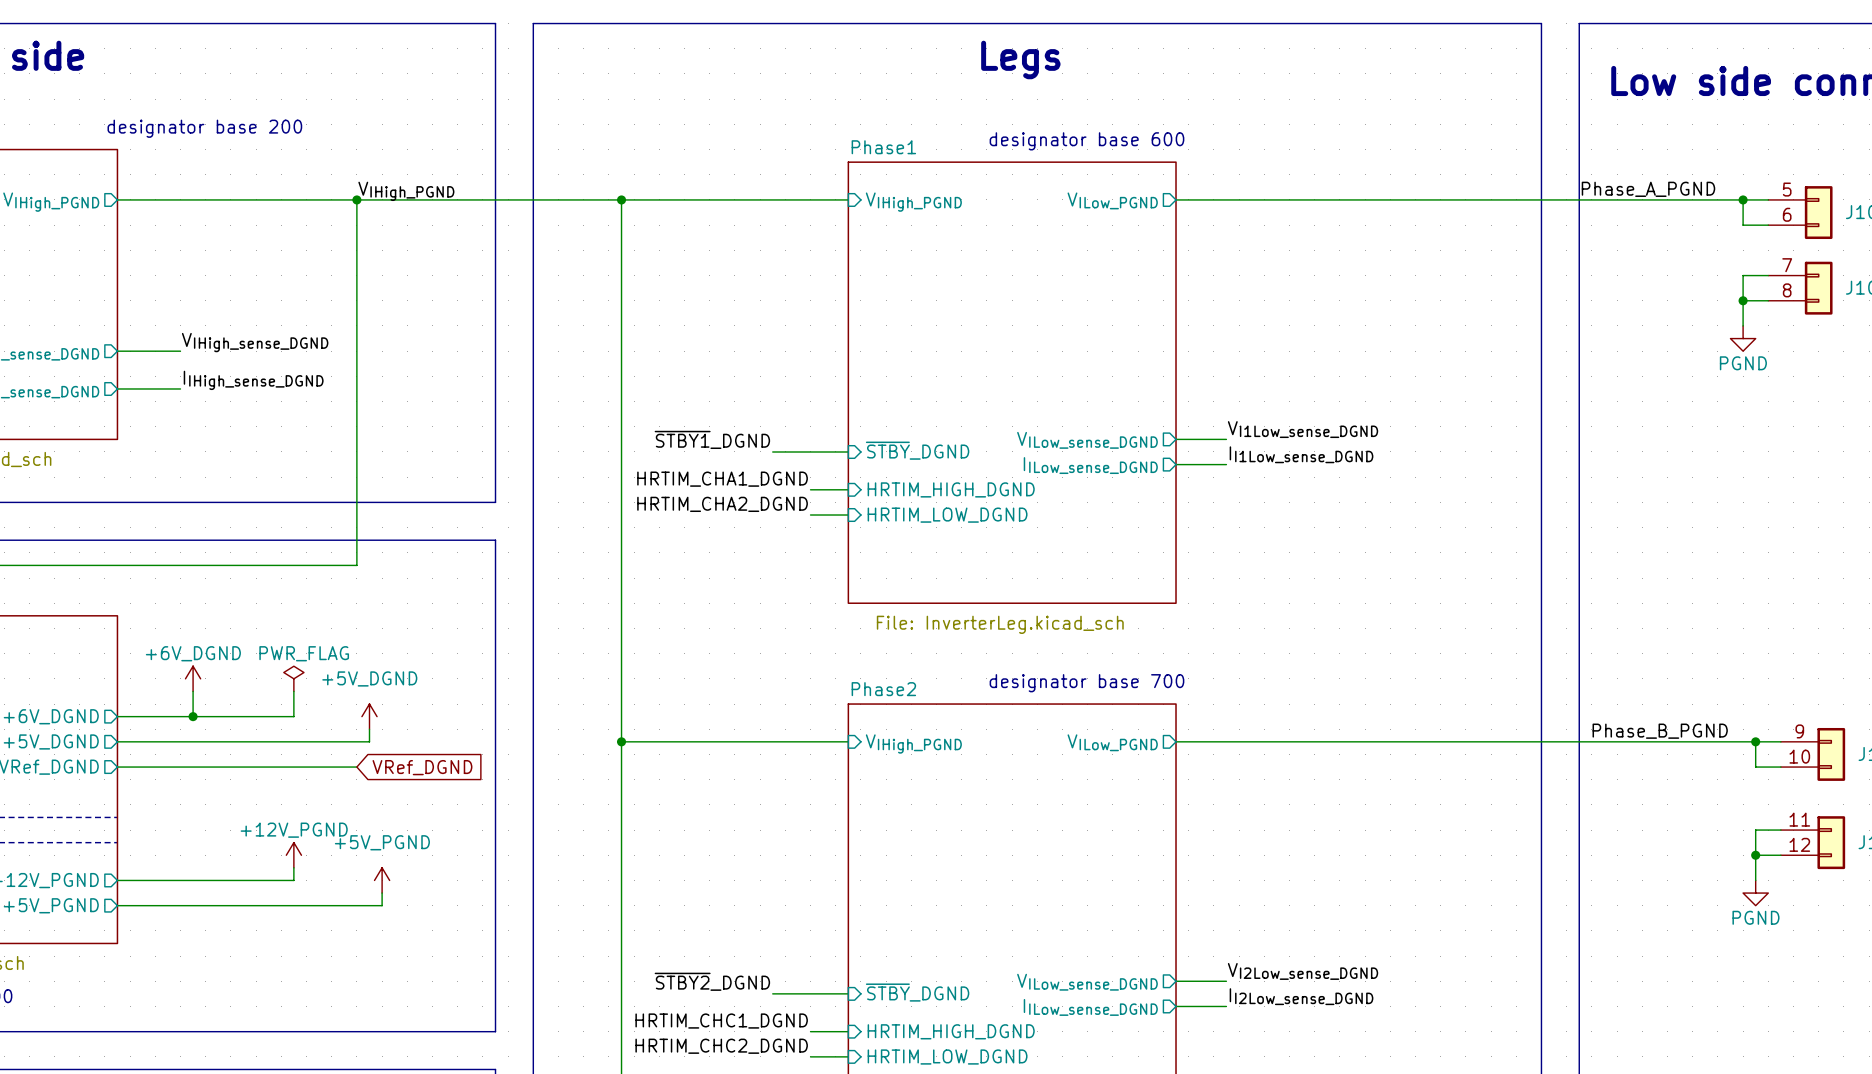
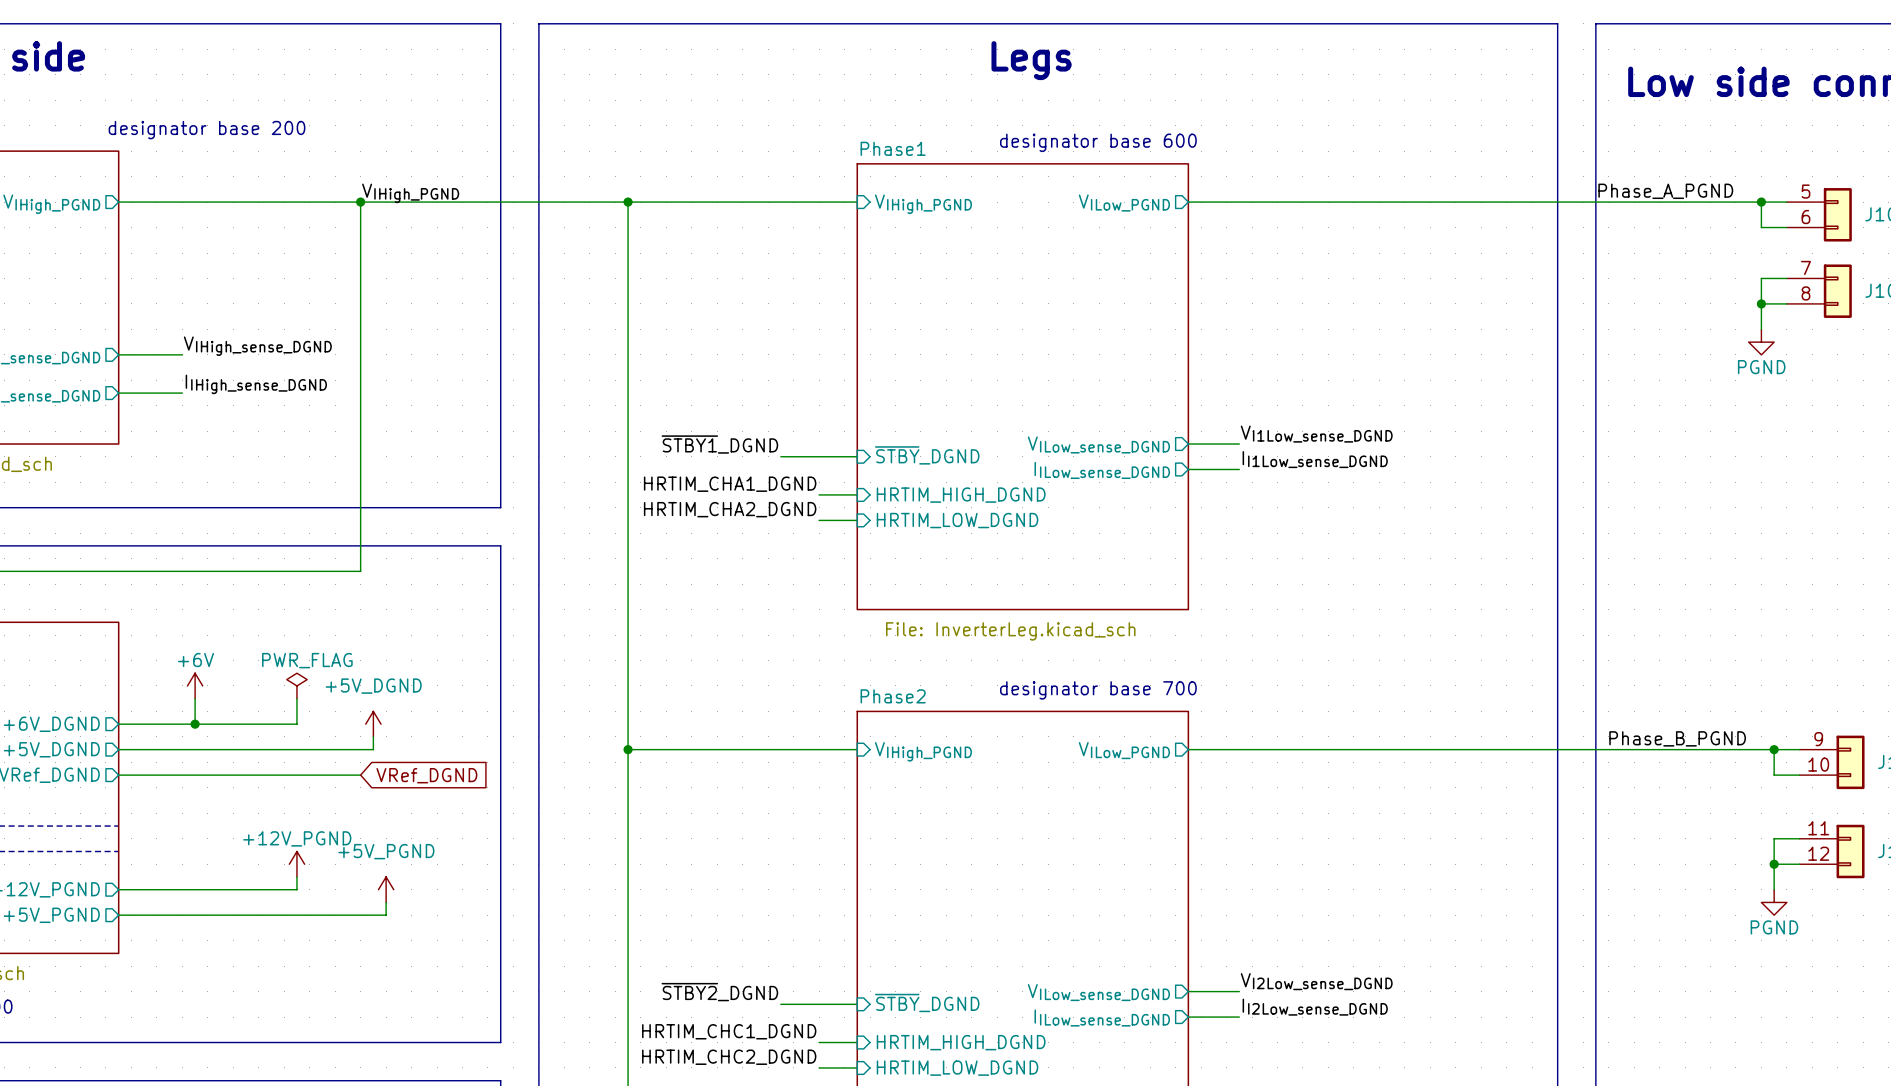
power symbol: +6V_DGND (193, 678) -> +6V (195, 685)

